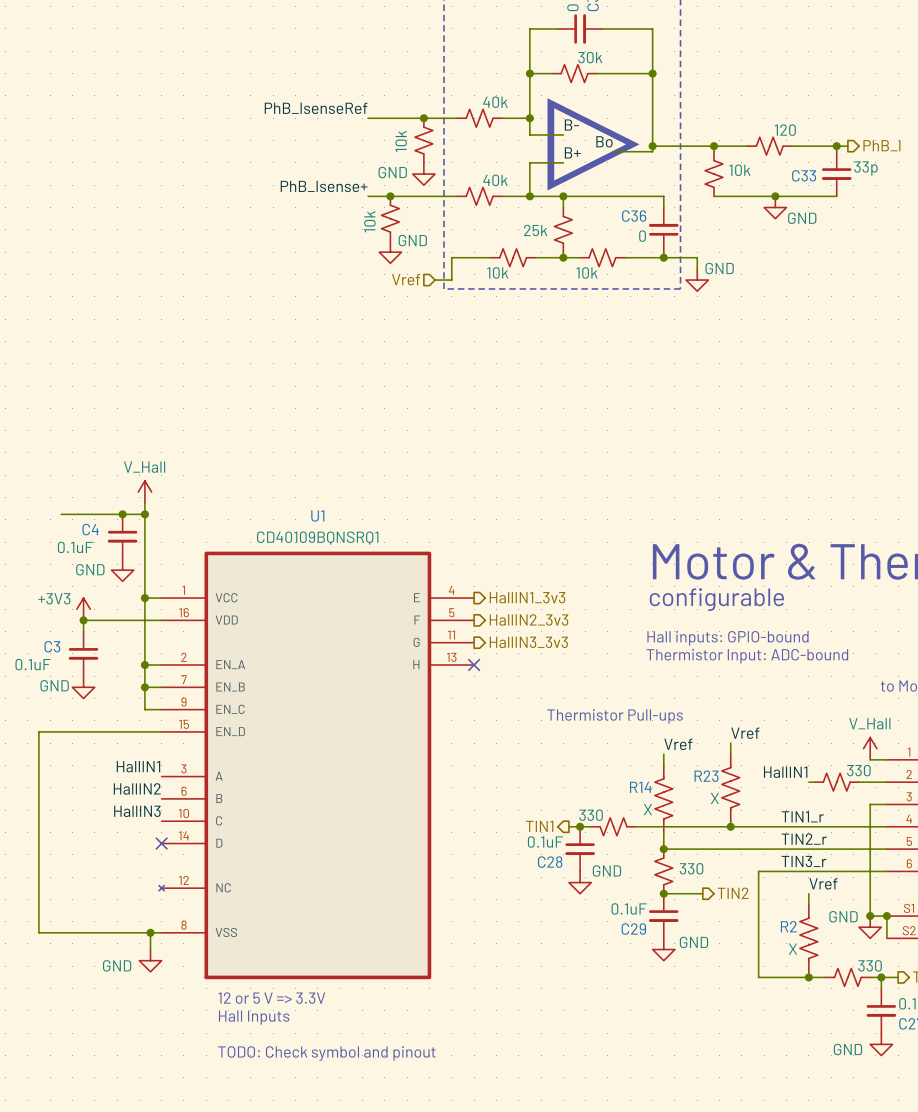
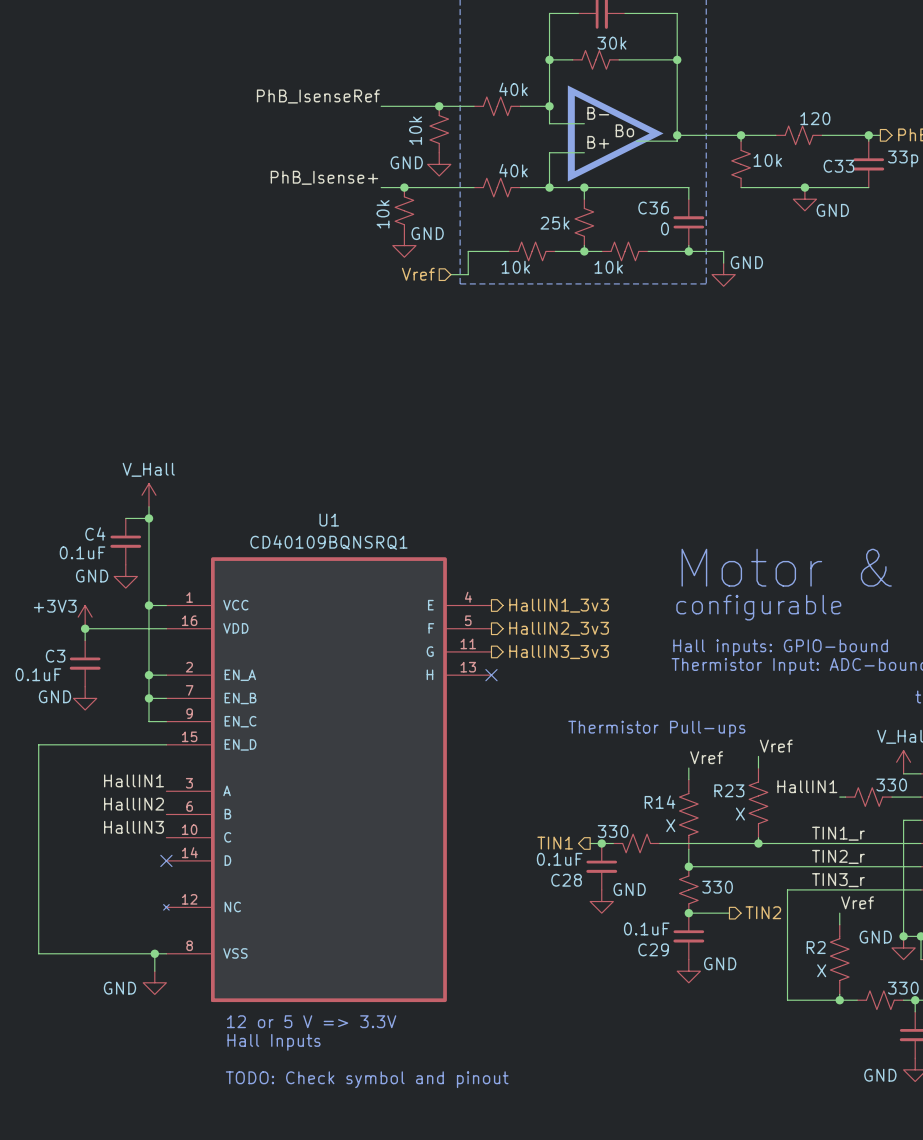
wire: (61, 514) (122, 514) -> none
junction: (122, 514) -> none

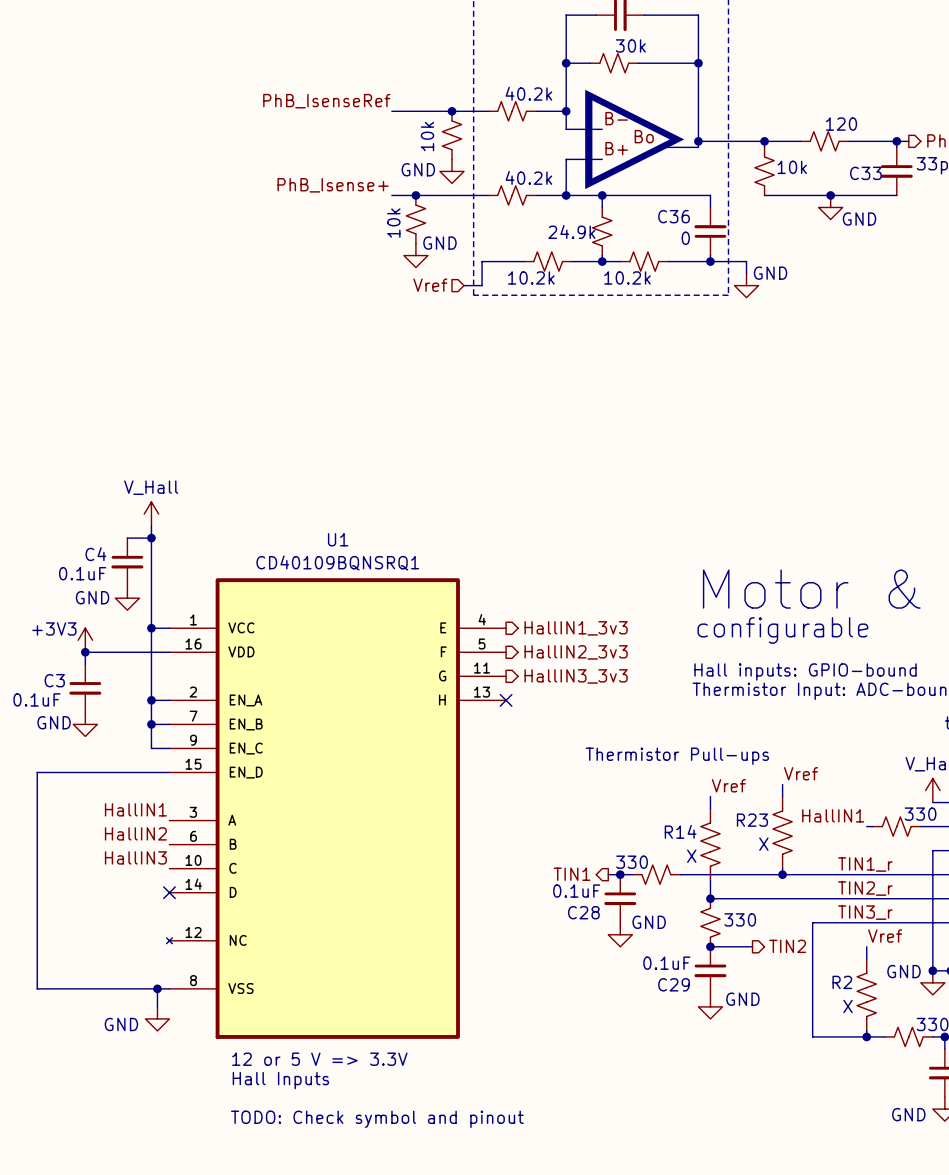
part value: 40k (513, 89) -> 40.2k (528, 93)
part value: 40k (513, 170) -> 40.2k (528, 177)
part value: 25k (555, 223) -> 24.9k (571, 231)
part value: 10k (515, 267) -> 10.2k (531, 277)
part value: 10k (608, 267) -> 10.2k (627, 277)

